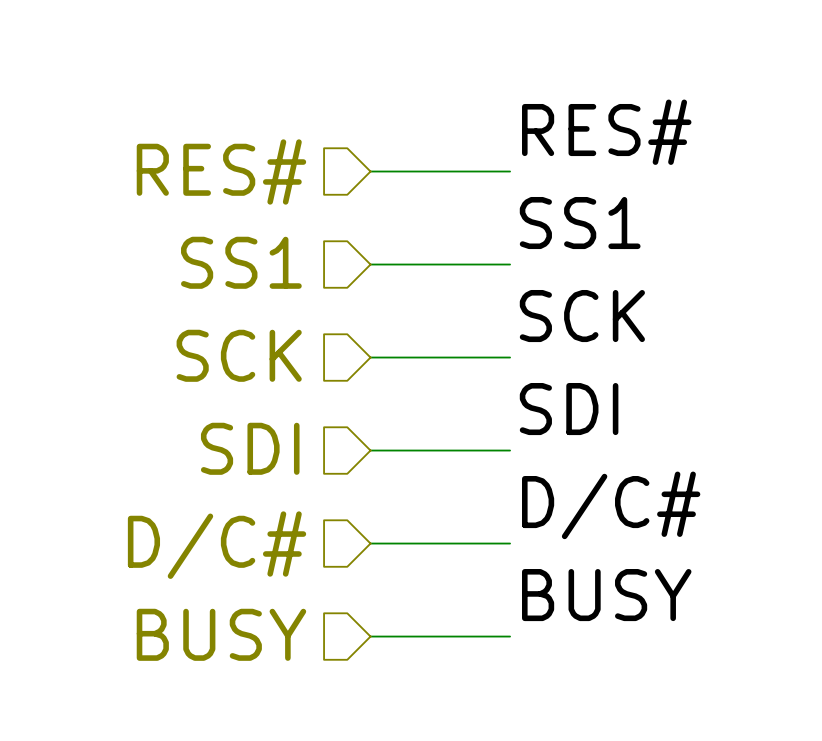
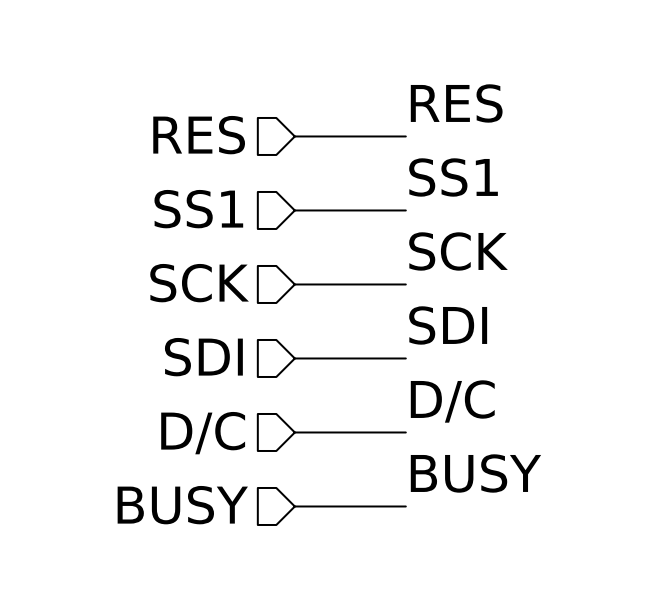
label: RES# (606, 132) -> RES (456, 103)
hierarchical label: RES# (221, 171) -> RES (199, 135)
label: D/C# (611, 505) -> D/C (452, 401)
hierarchical label: D/C# (217, 545) -> D/C (203, 433)

